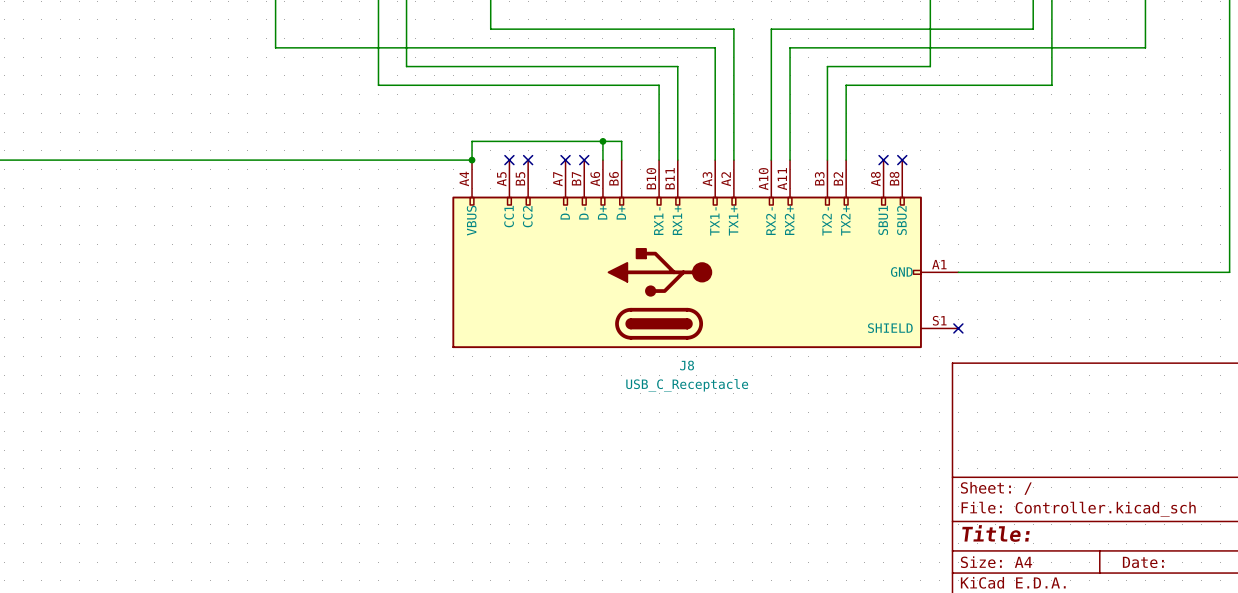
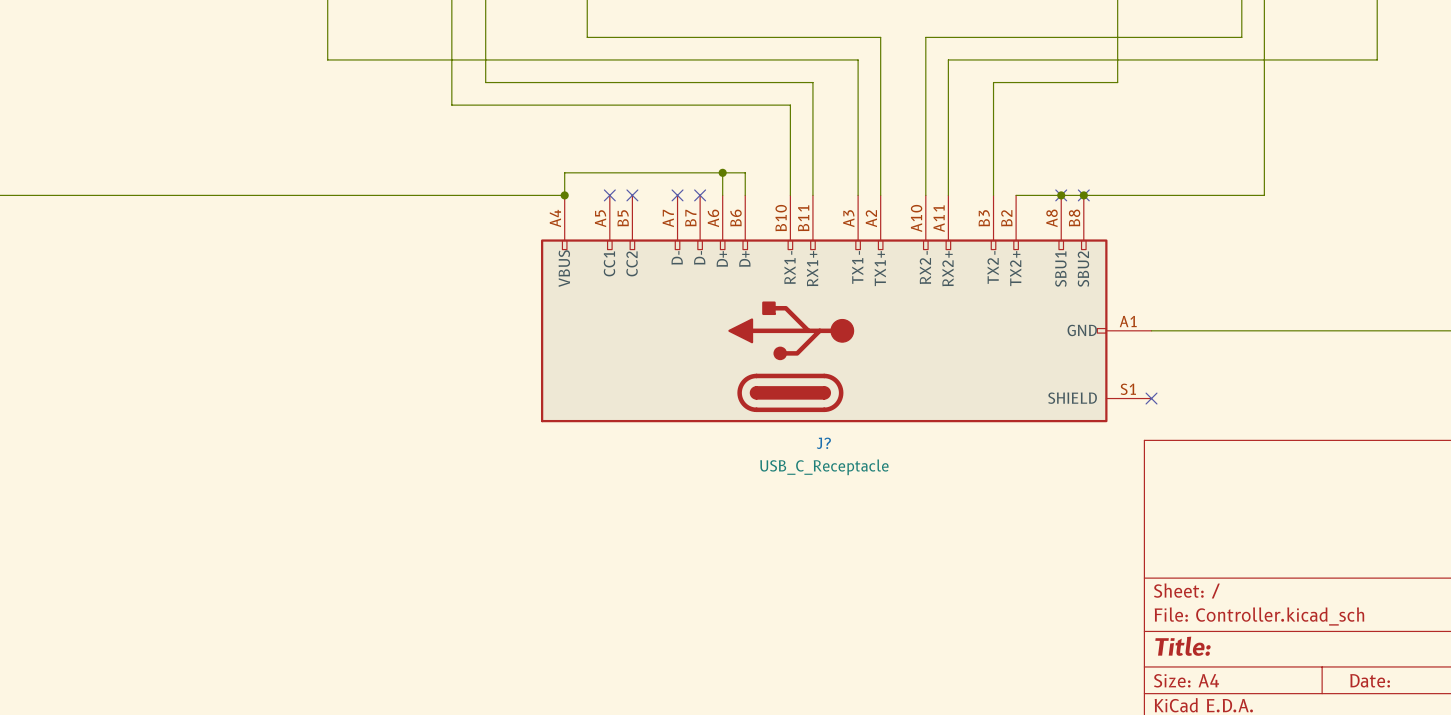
wire: (1051, 85) (846, 85) (846, 160) -> (1264, 105) (1264, 195) (1016, 195)
junction: none -> (1061, 195)
junction: none -> (1083, 195)
J8 name: J8 (687, 365) -> J? (823, 443)

